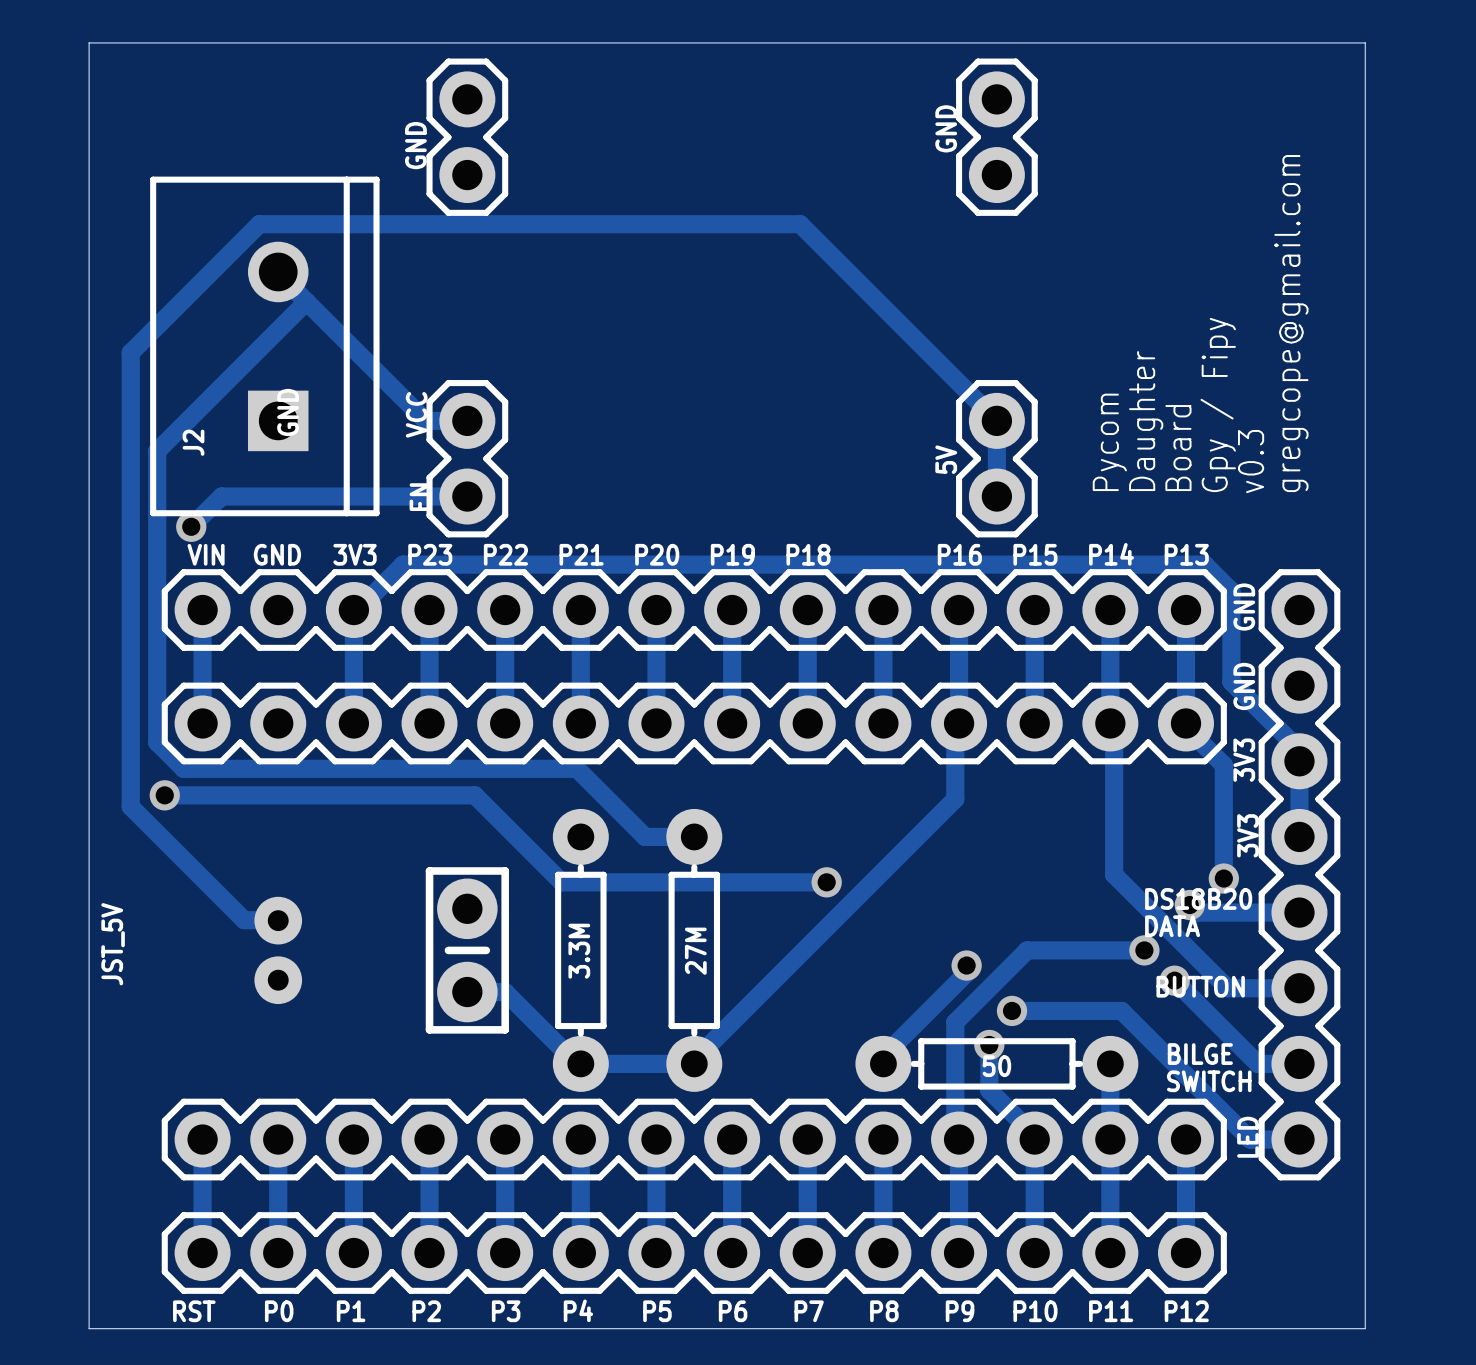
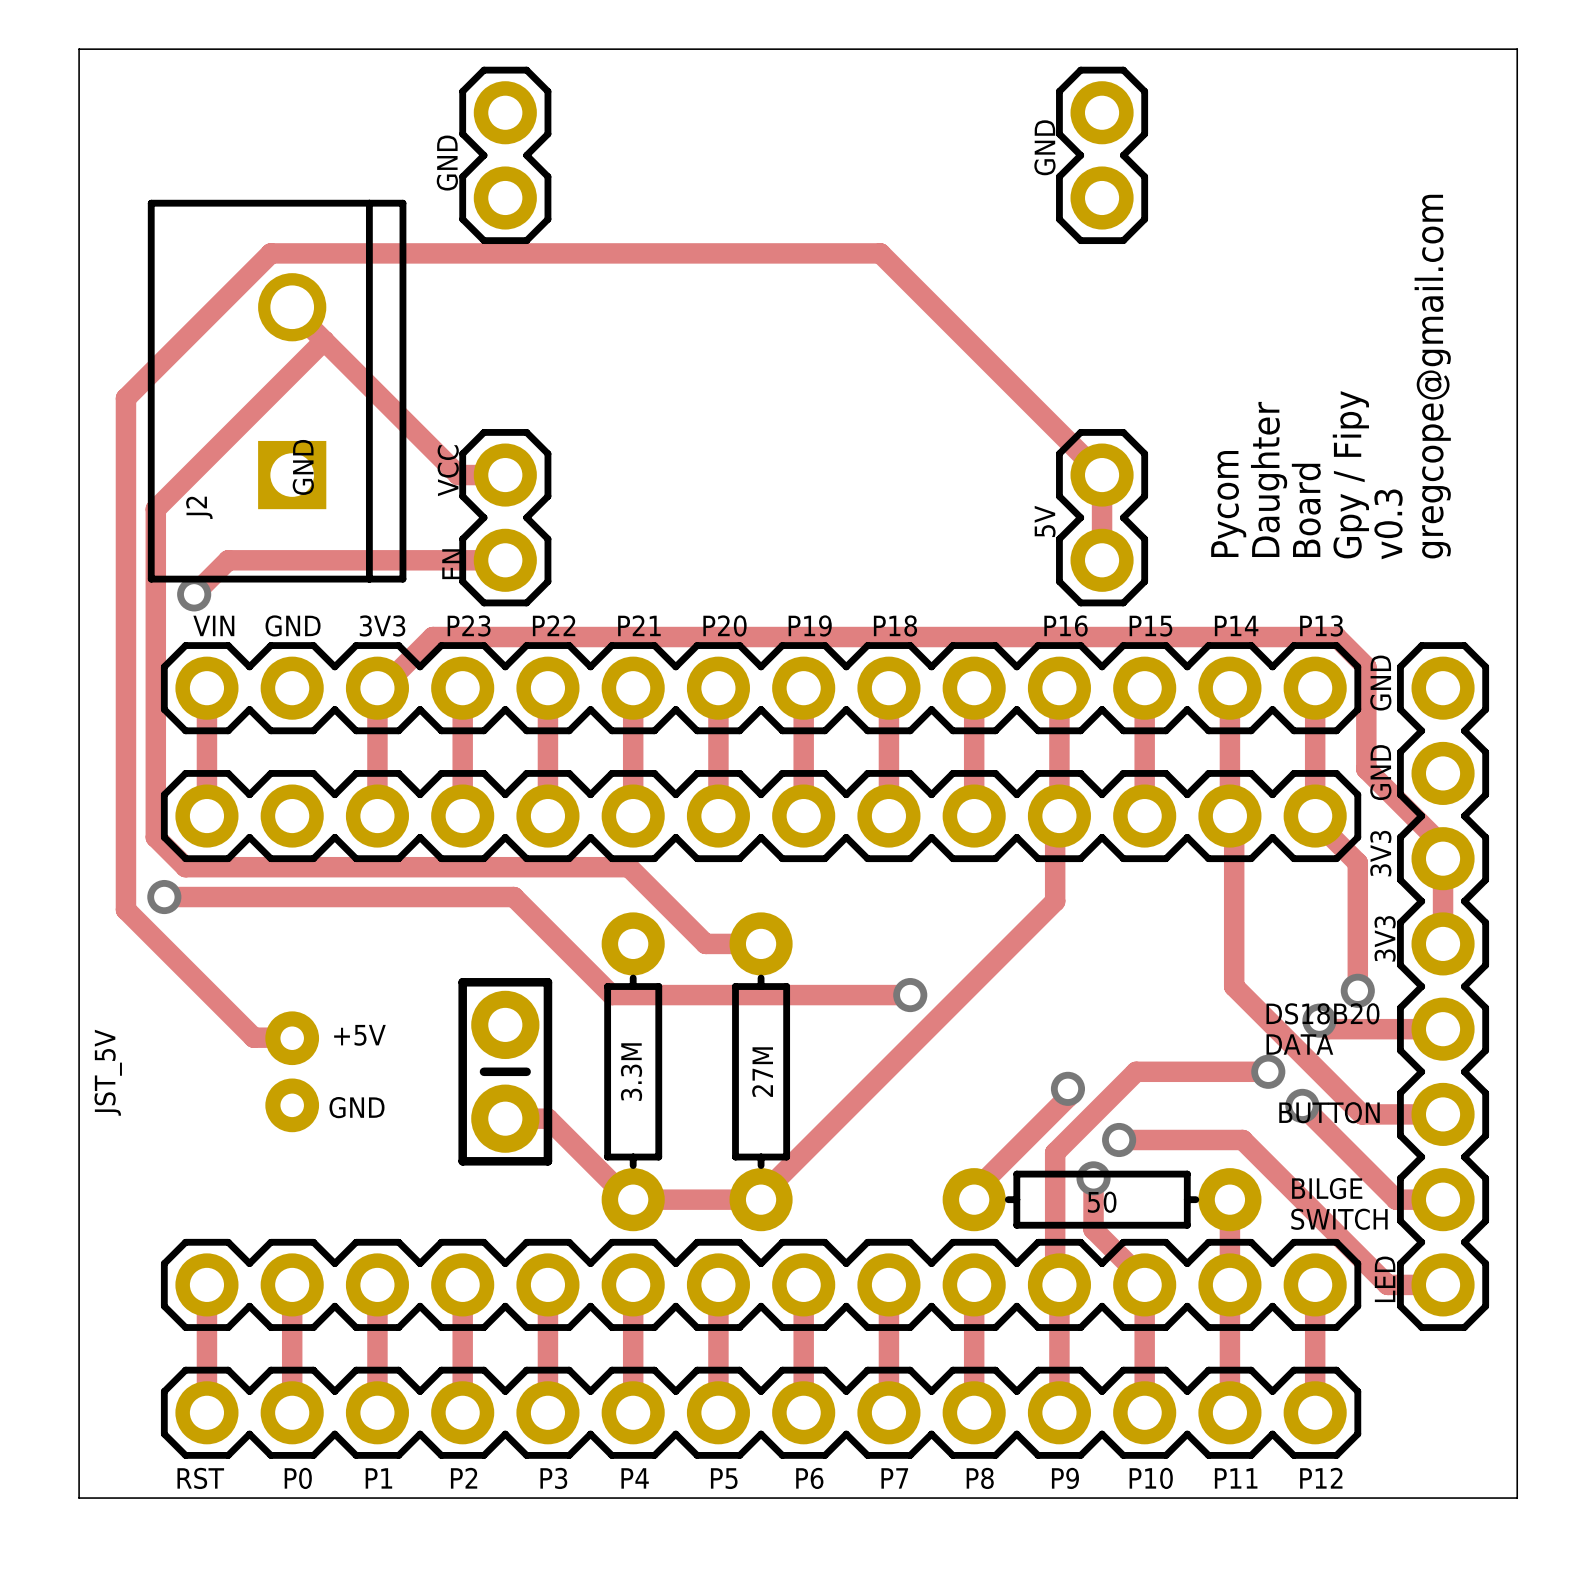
text: none -> +5V (359, 1035)
text: none -> GND (356, 1107)

